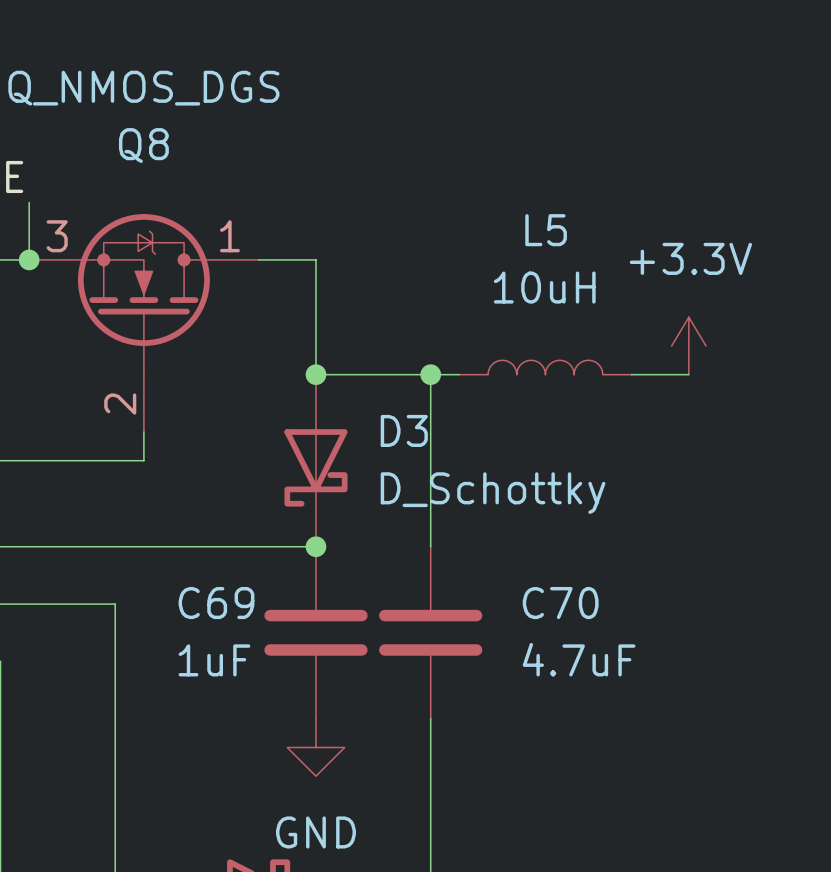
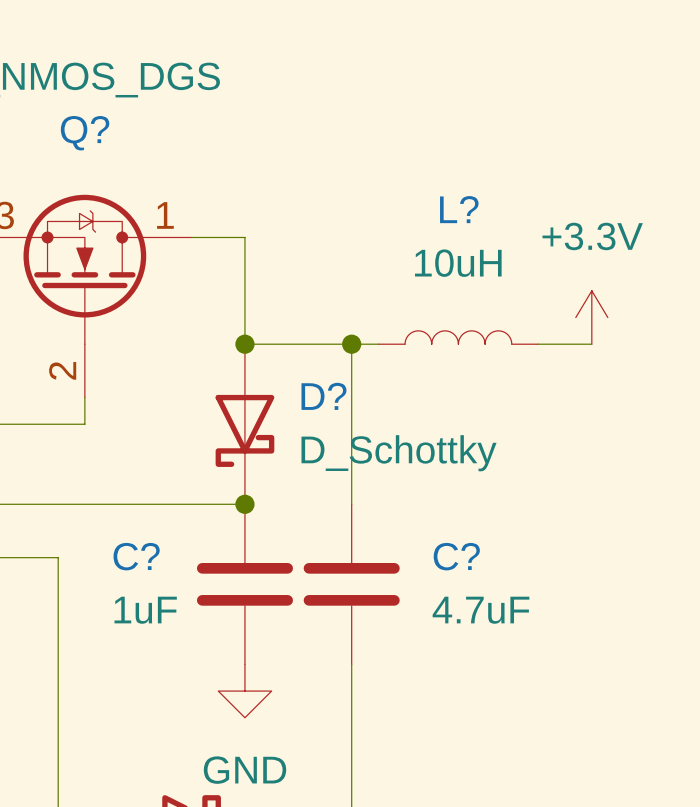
Q8 name: Q8 (143, 145) -> Q? (85, 133)
L5 name: L5 (546, 230) -> L? (459, 209)
D3 name: D3 (404, 430) -> D? (323, 396)
C69 name: C69 (216, 603) -> C? (136, 556)
C70 name: C70 (560, 603) -> C? (456, 556)

